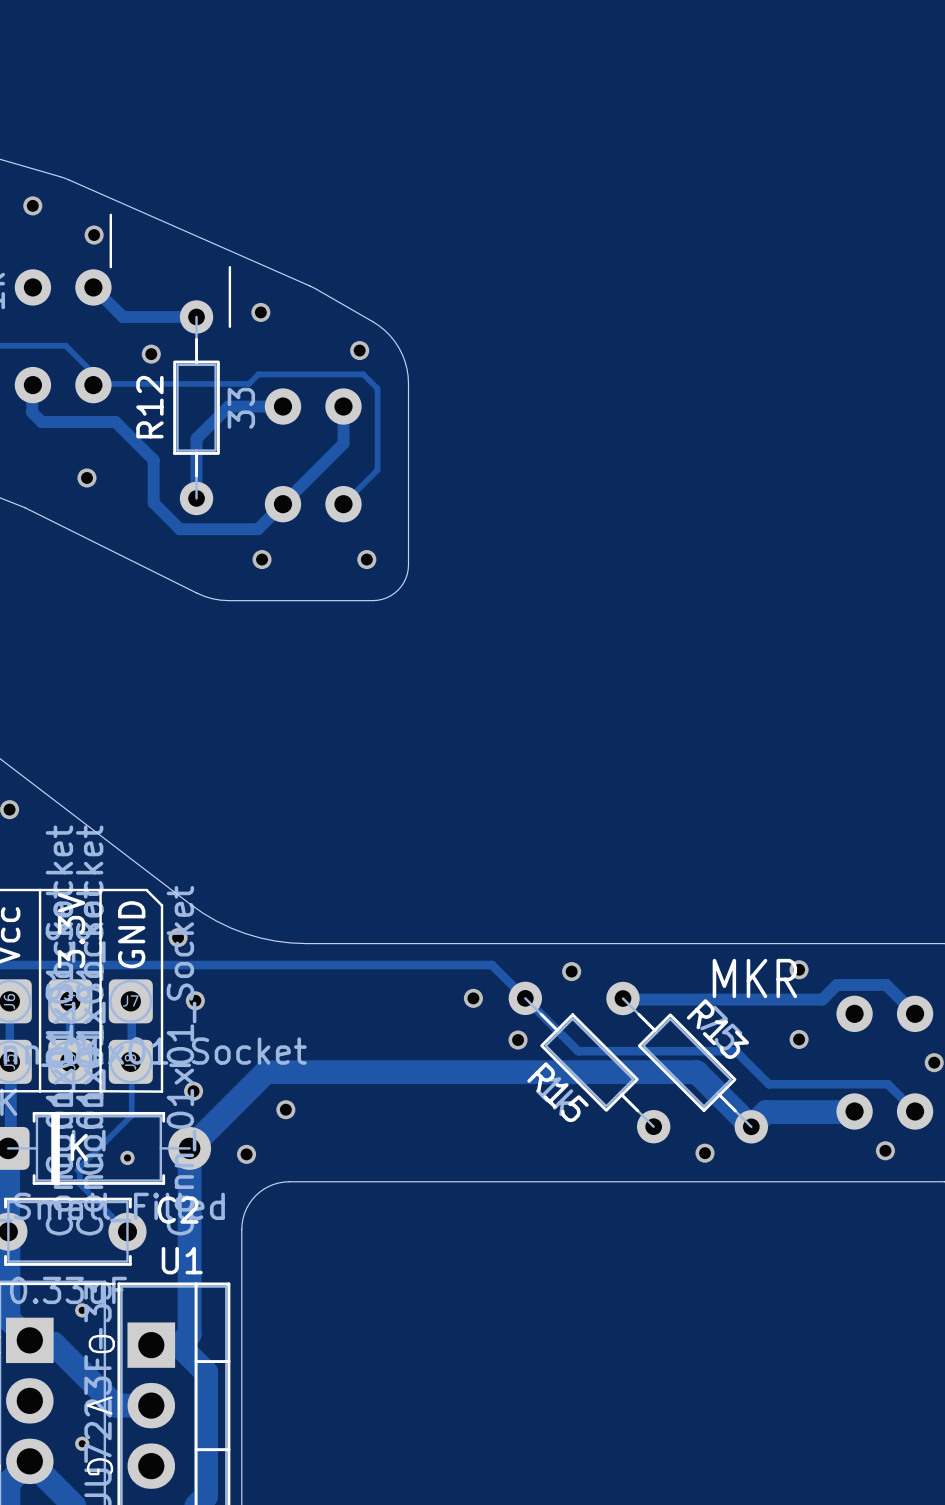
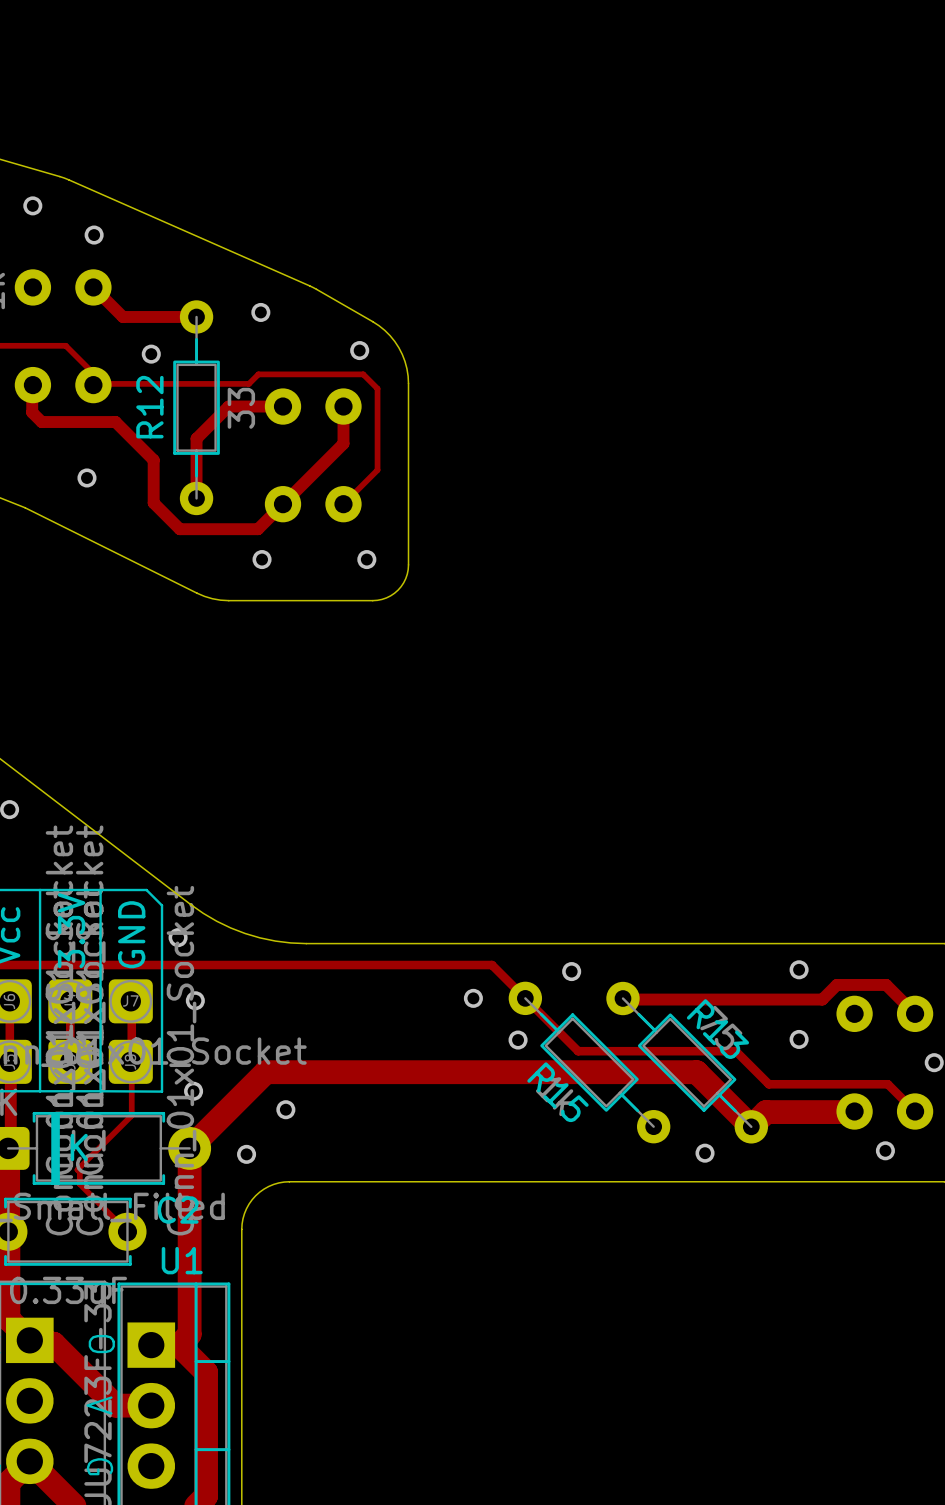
line: (110, 214) (110, 267) -> none
line: (229, 267) (229, 326) -> none
text: MKR (754, 978) -> none
via: (127, 1157) -> none
via: (82, 1310) -> none
via: (82, 1443) -> none

